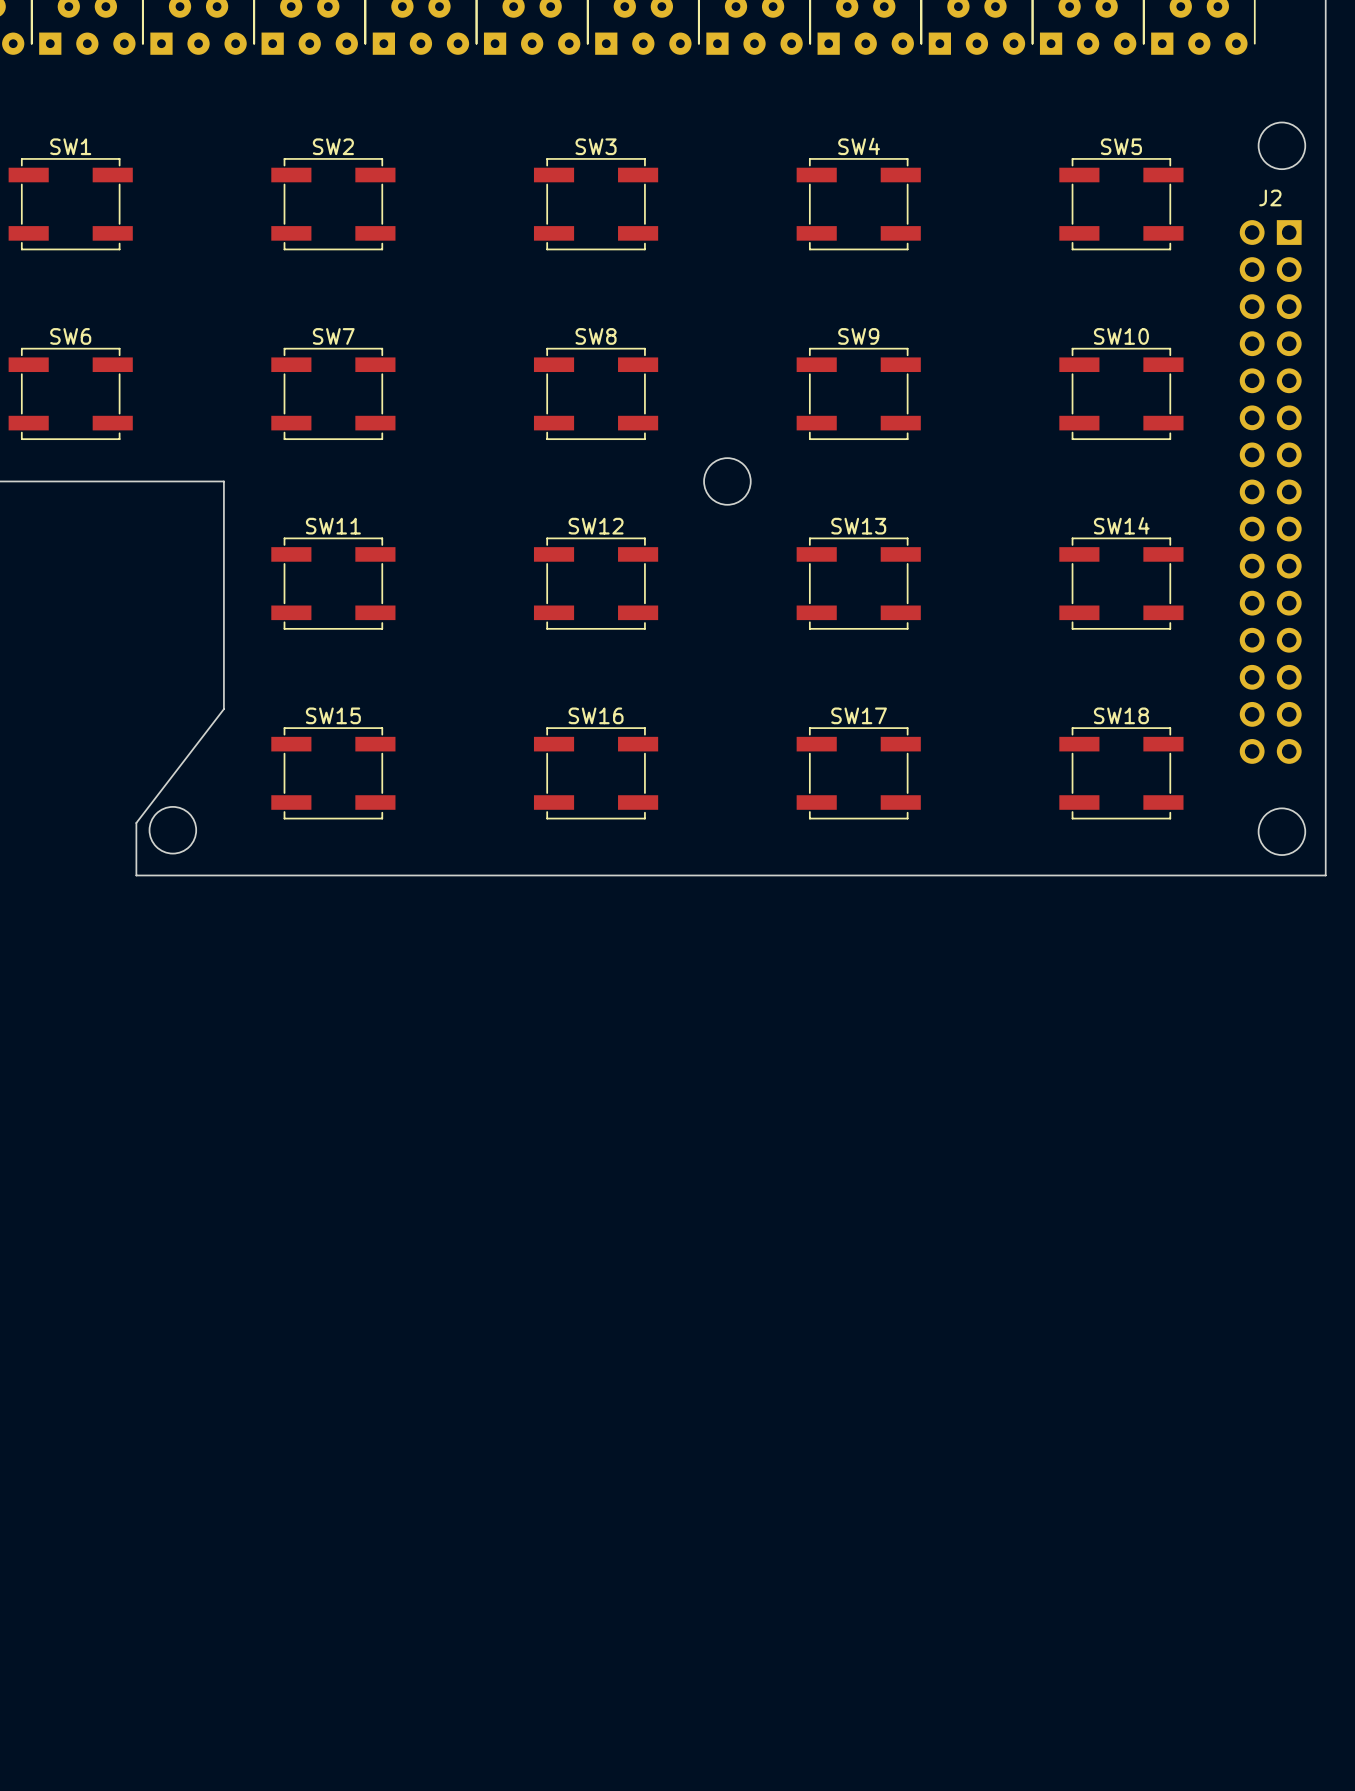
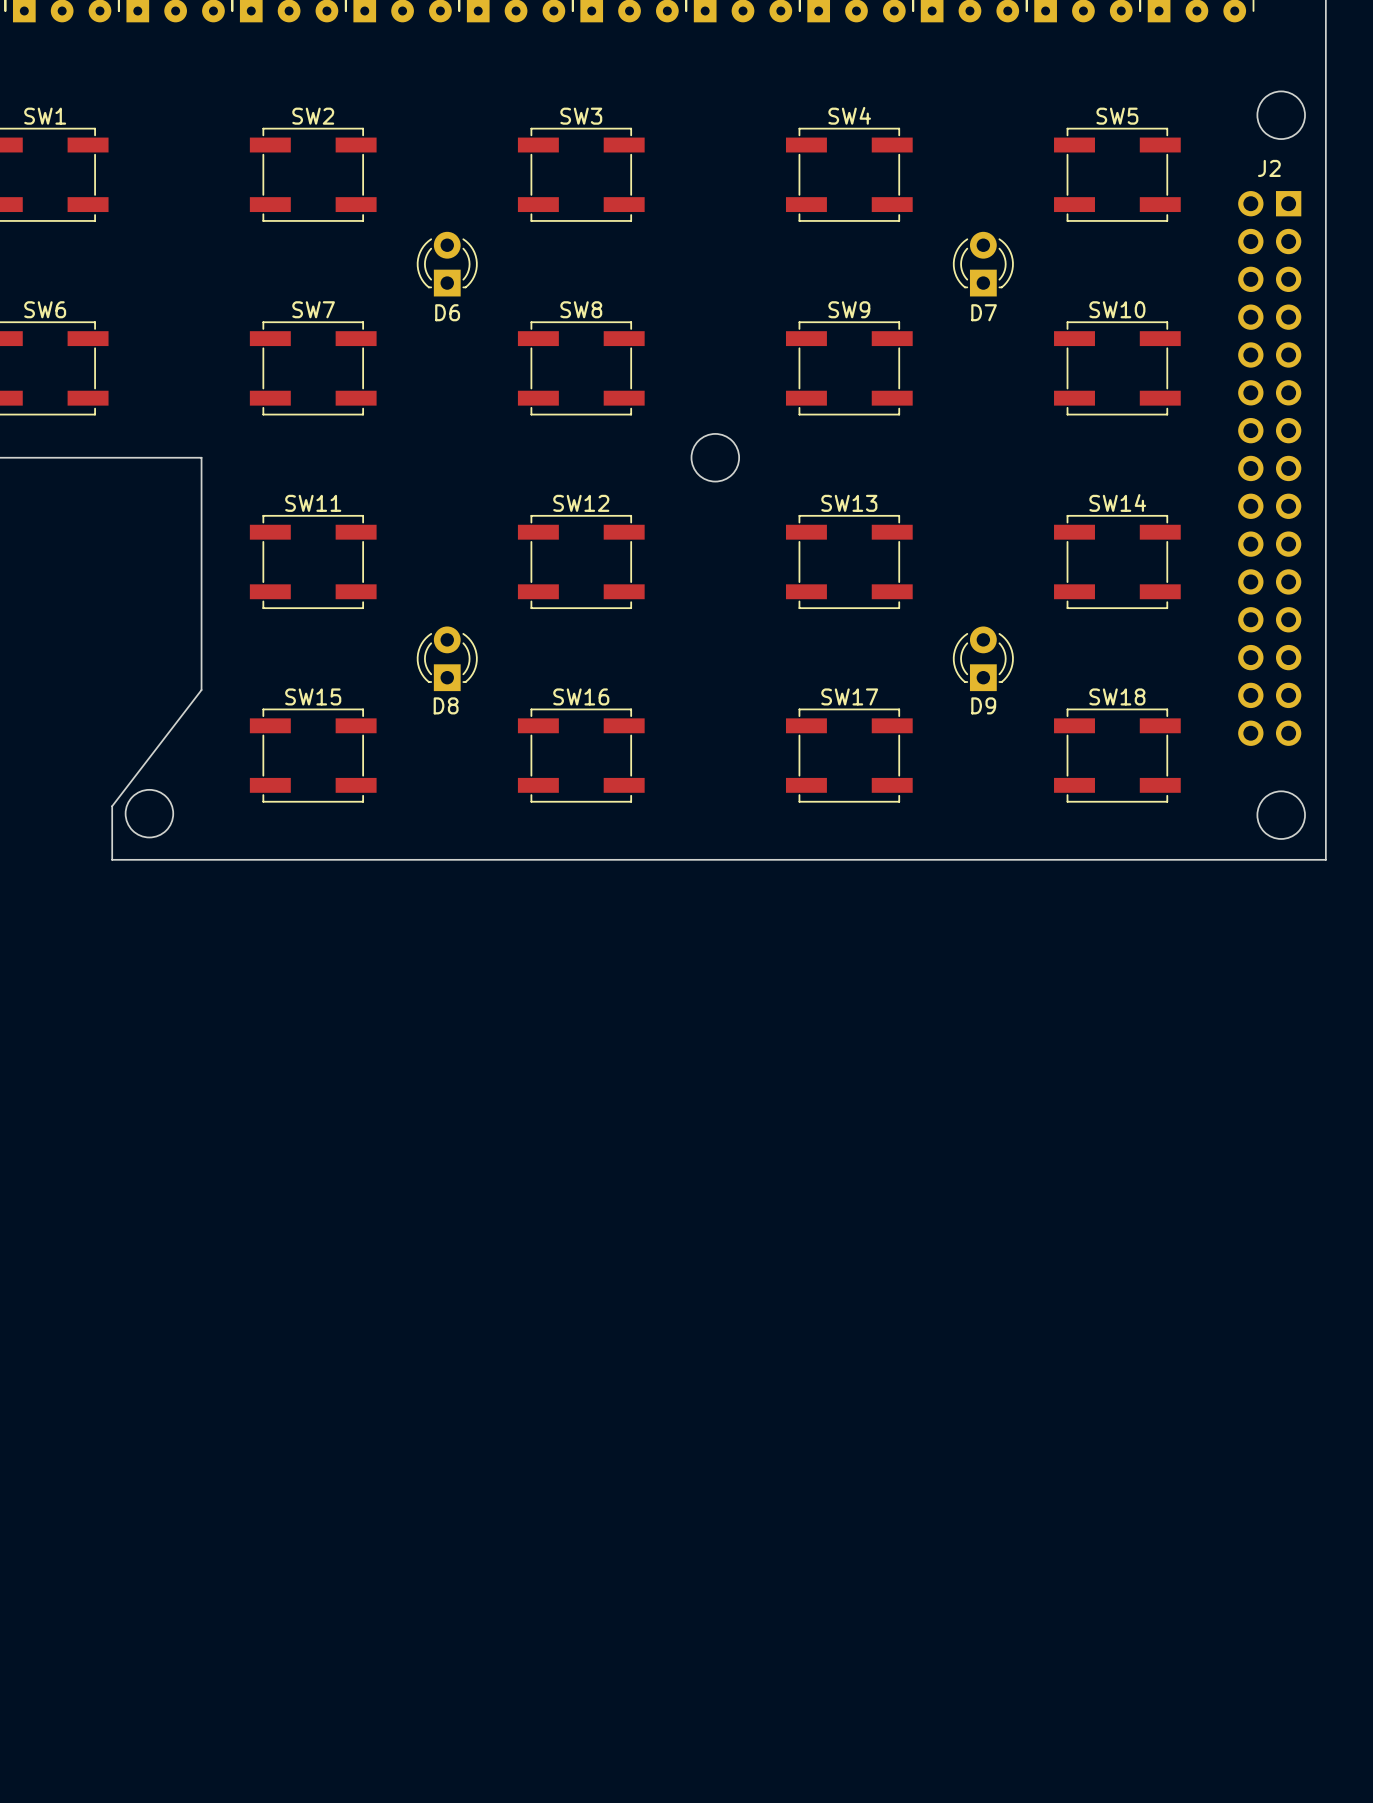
D6: none -> (447, 264)
D7: none -> (983, 264)
D8: none -> (447, 658)
D9: none -> (983, 658)

